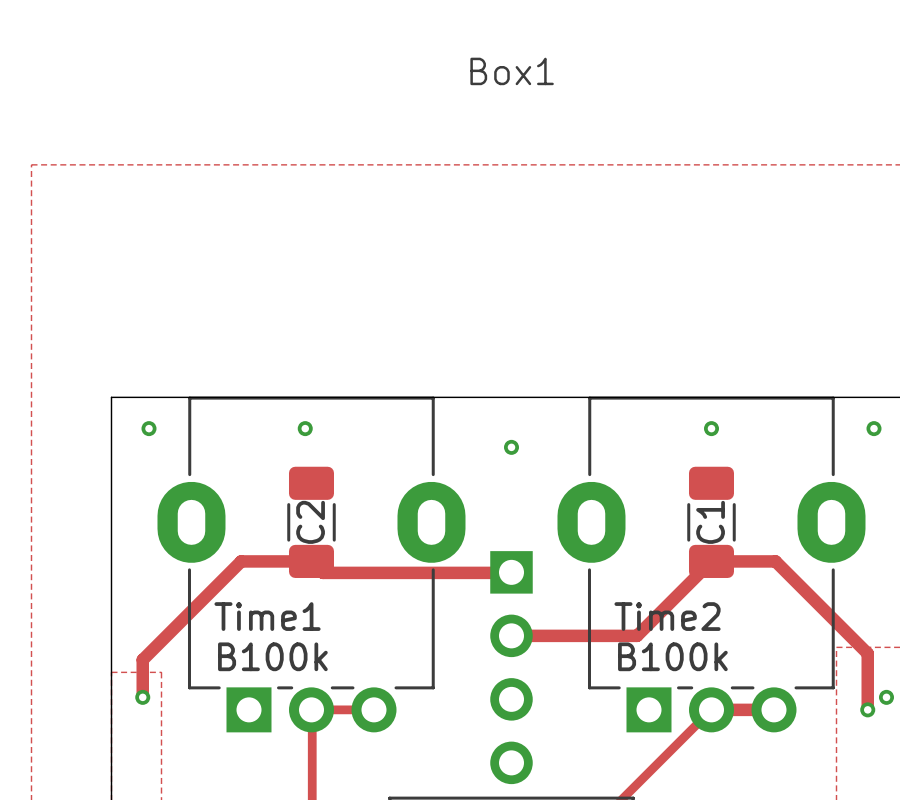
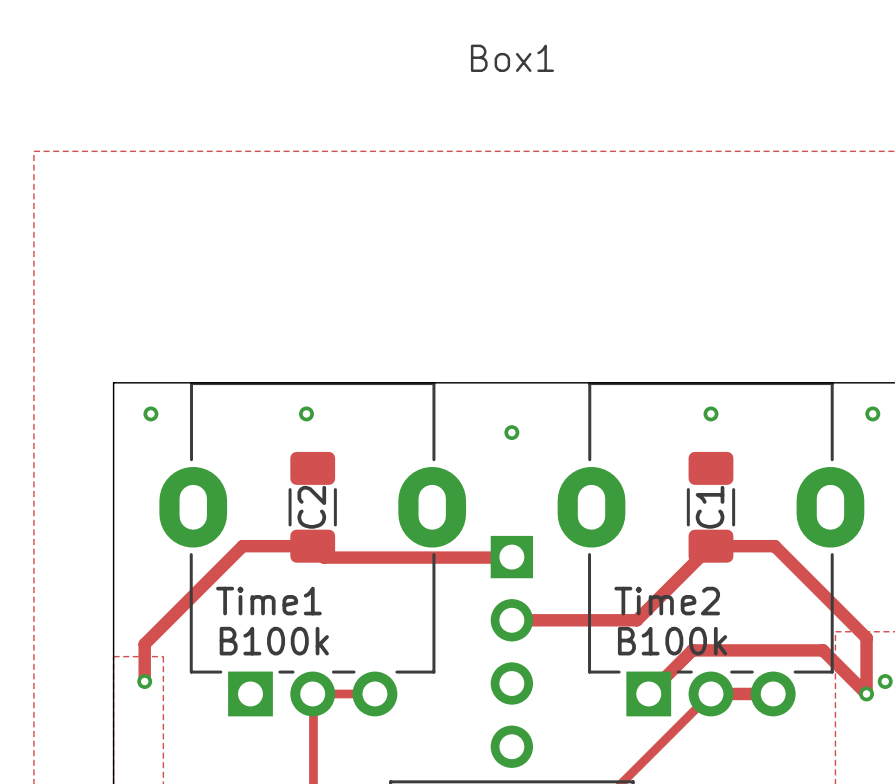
track: none -> (648, 693) (692, 650) (822, 650) (866, 693)

